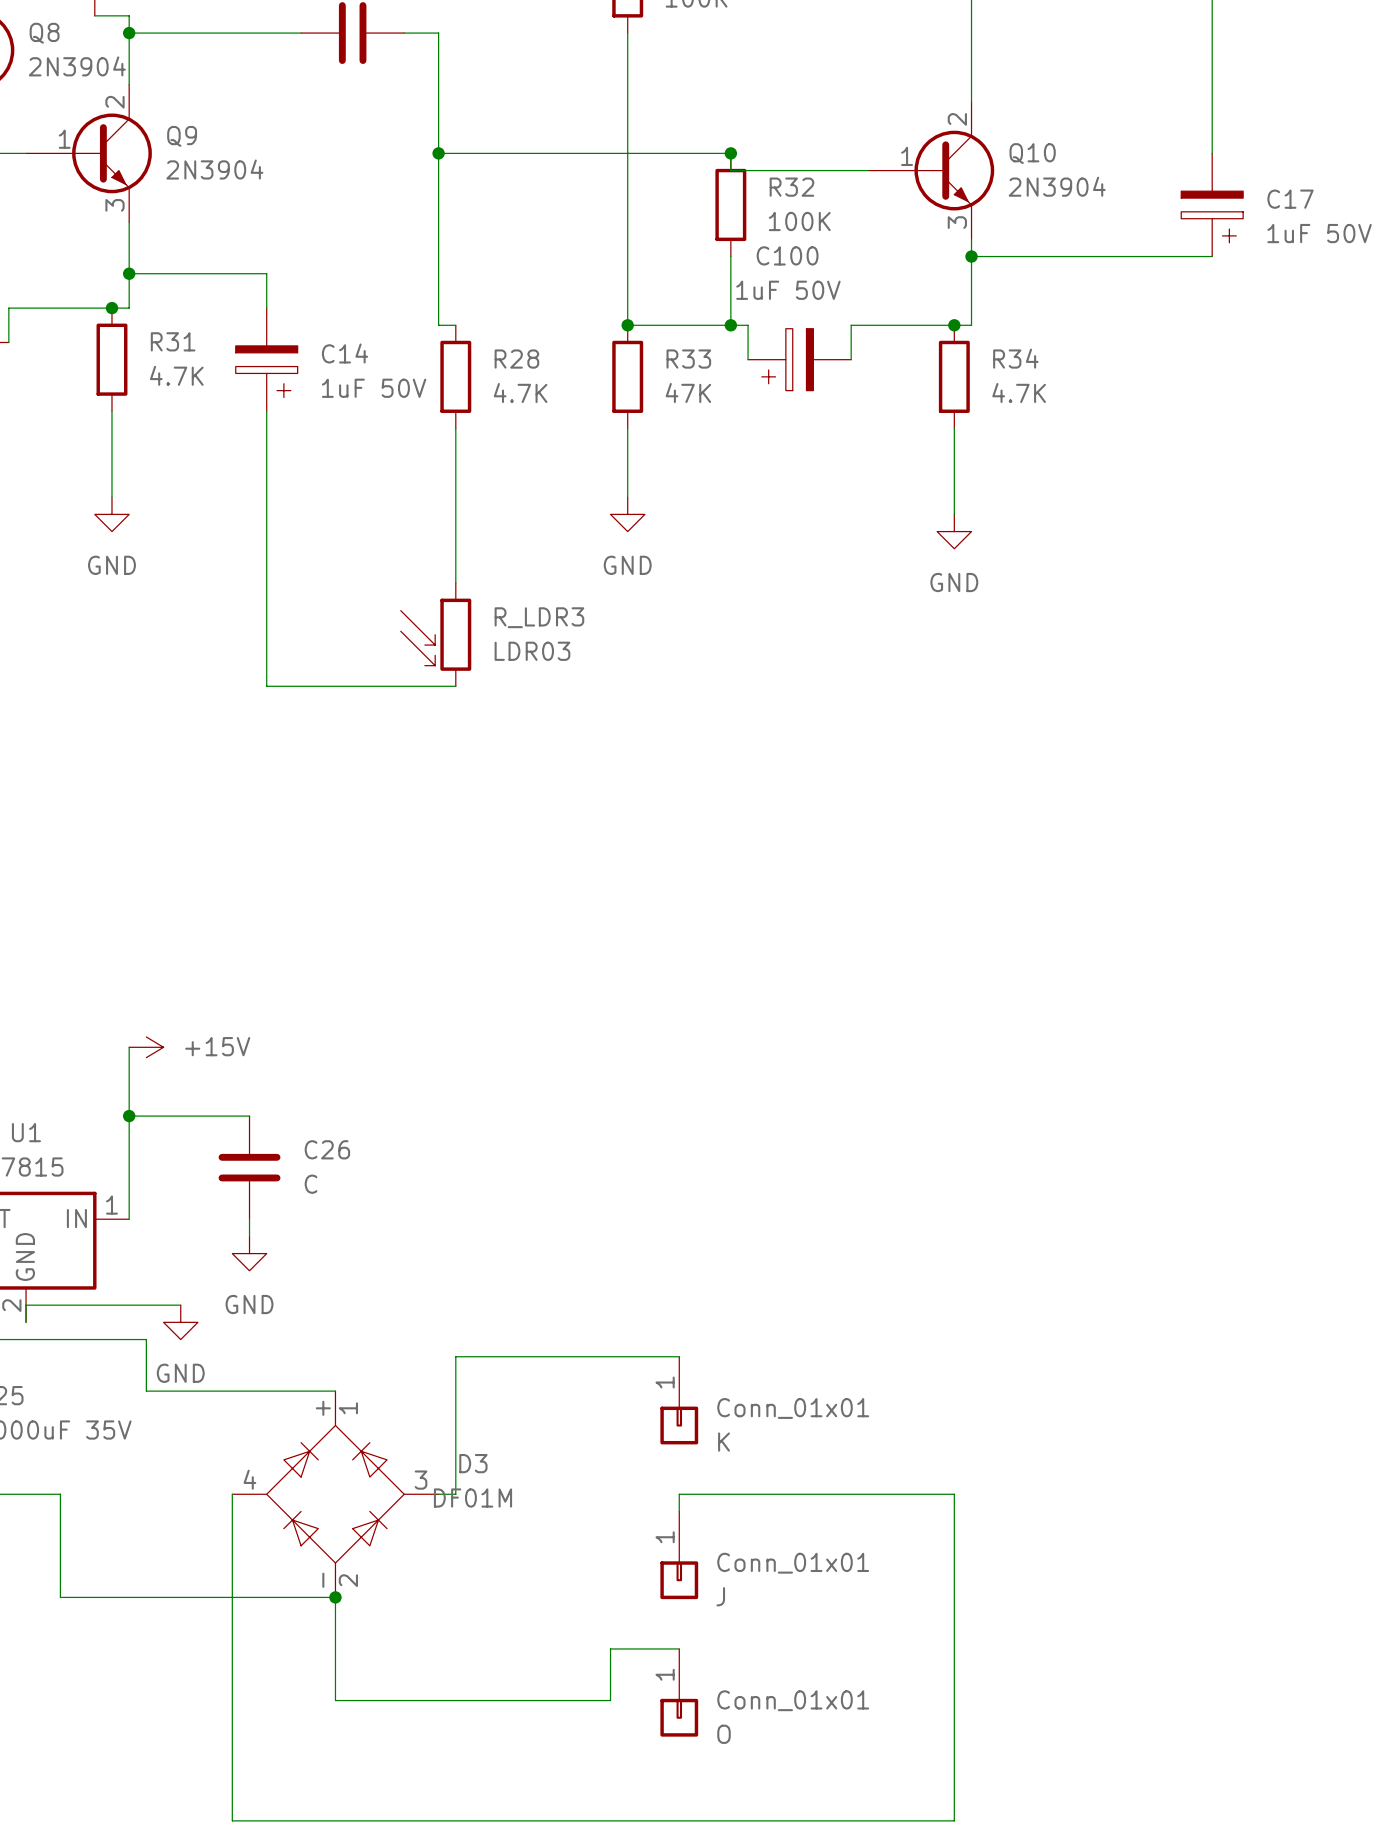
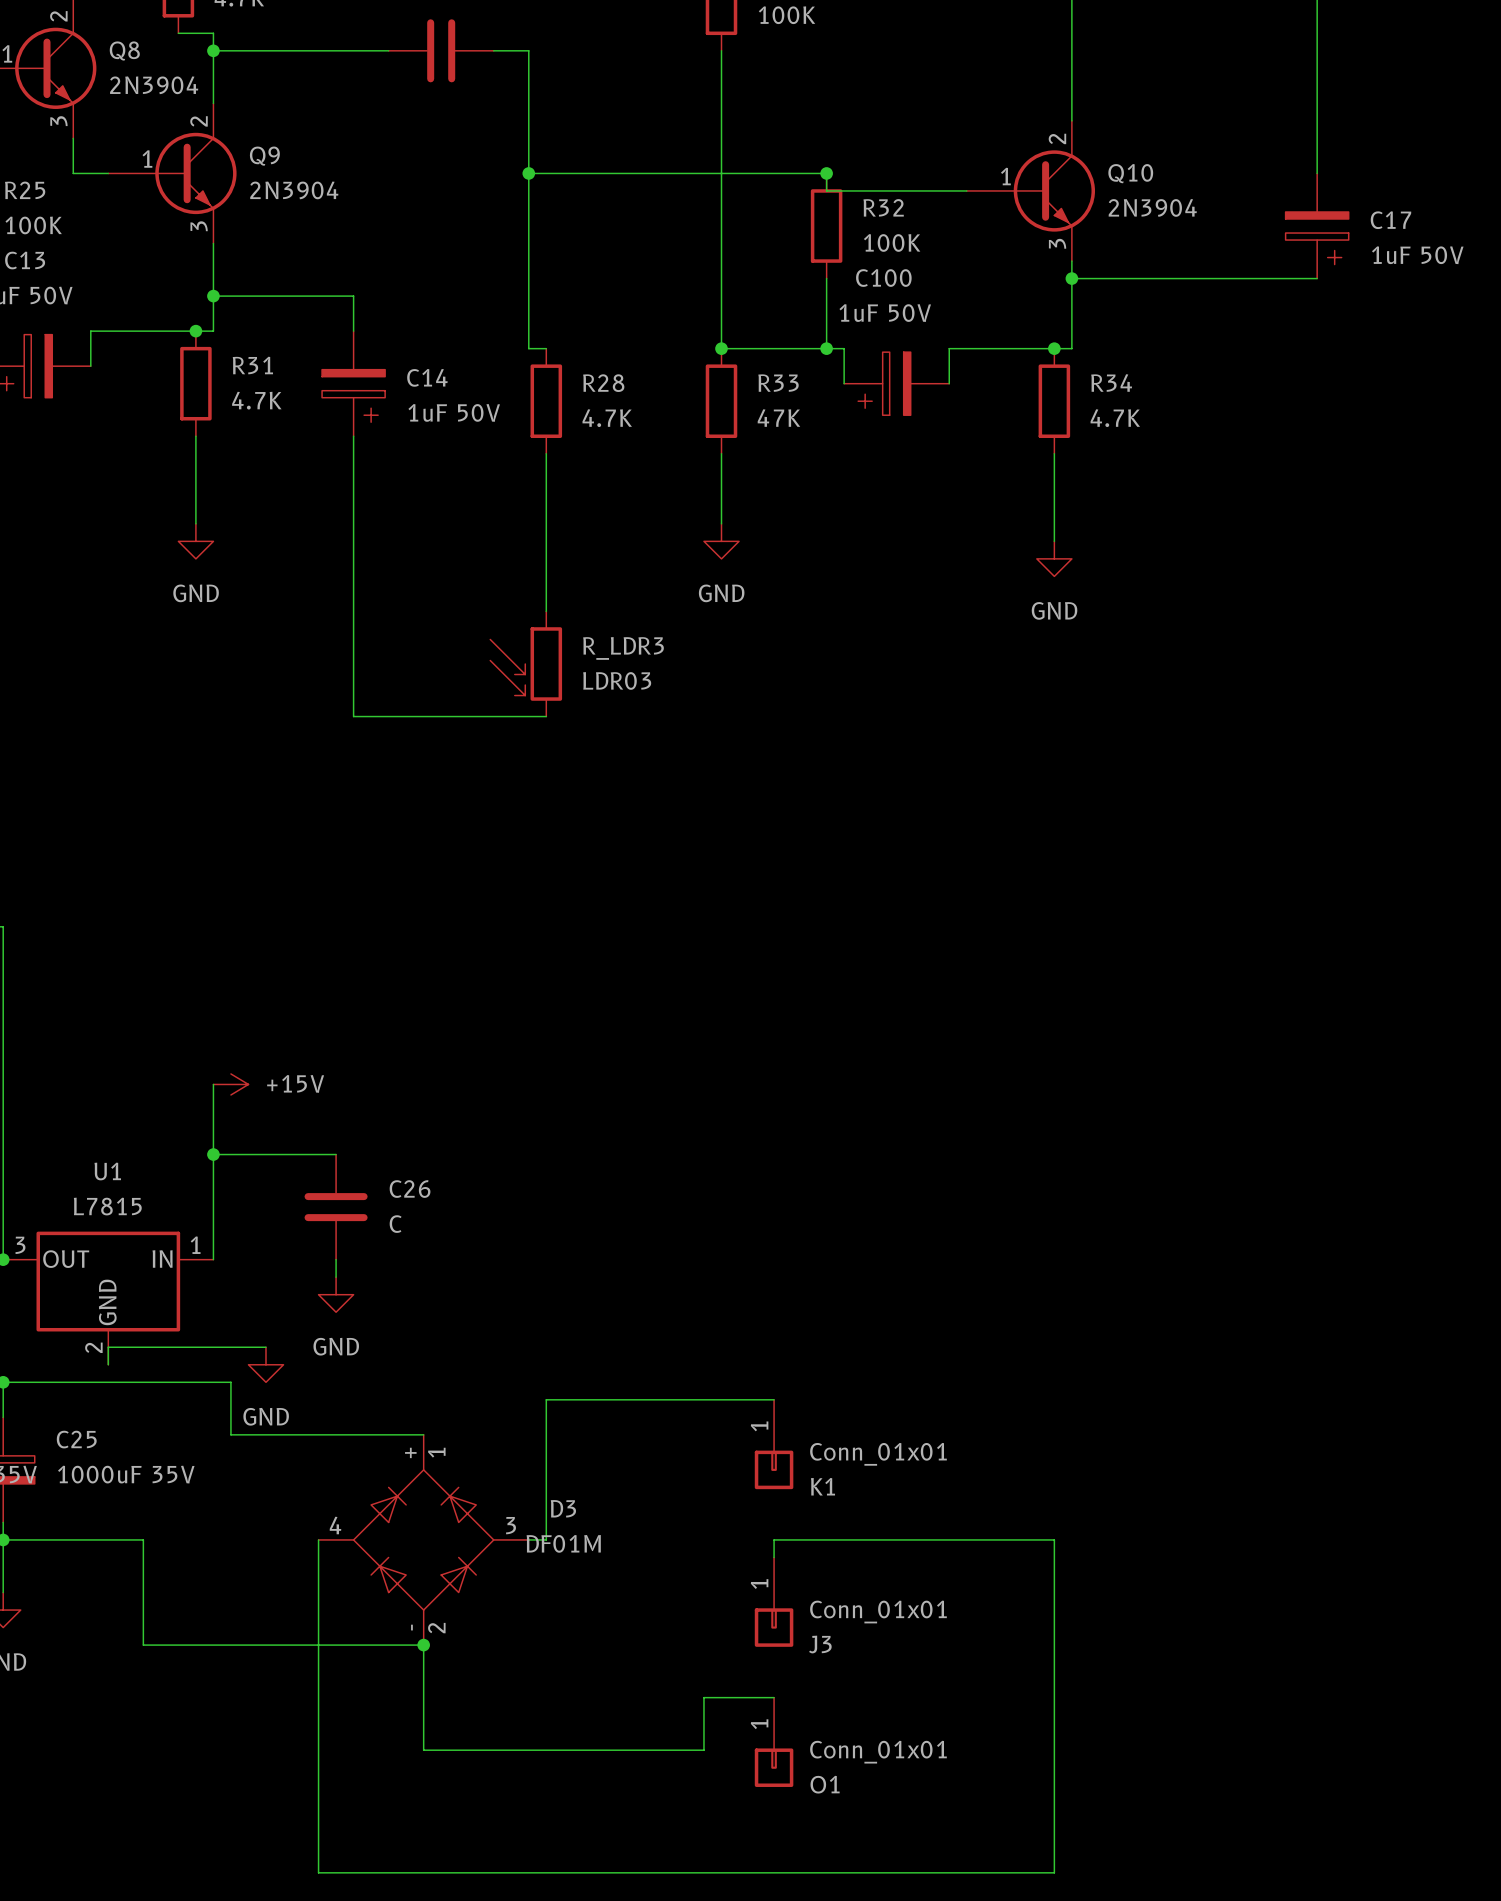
K name: K (724, 1442) -> K1 (822, 1486)
J name: J (720, 1596) -> J3 (820, 1644)
O name: O (724, 1734) -> O1 (825, 1784)

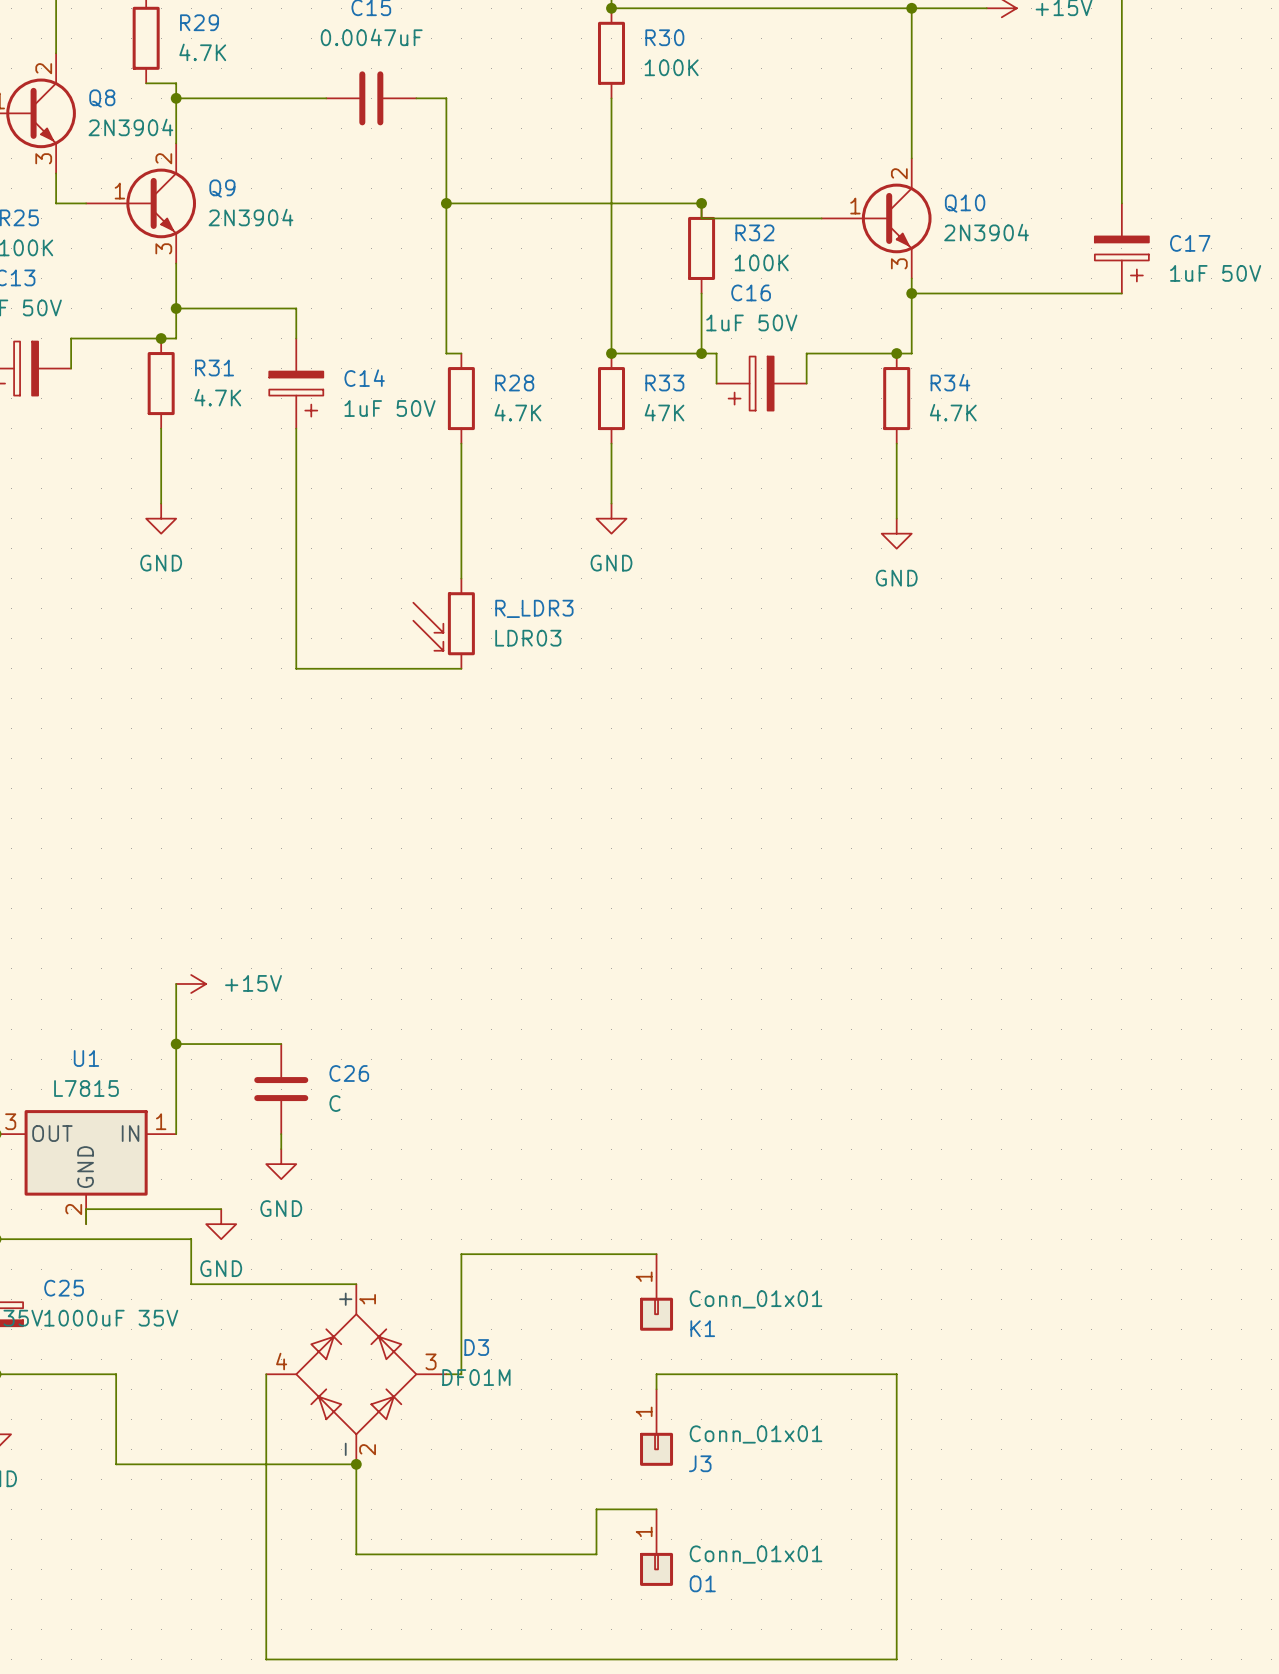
C100 name: C100 (883, 278) -> C16 (751, 292)

